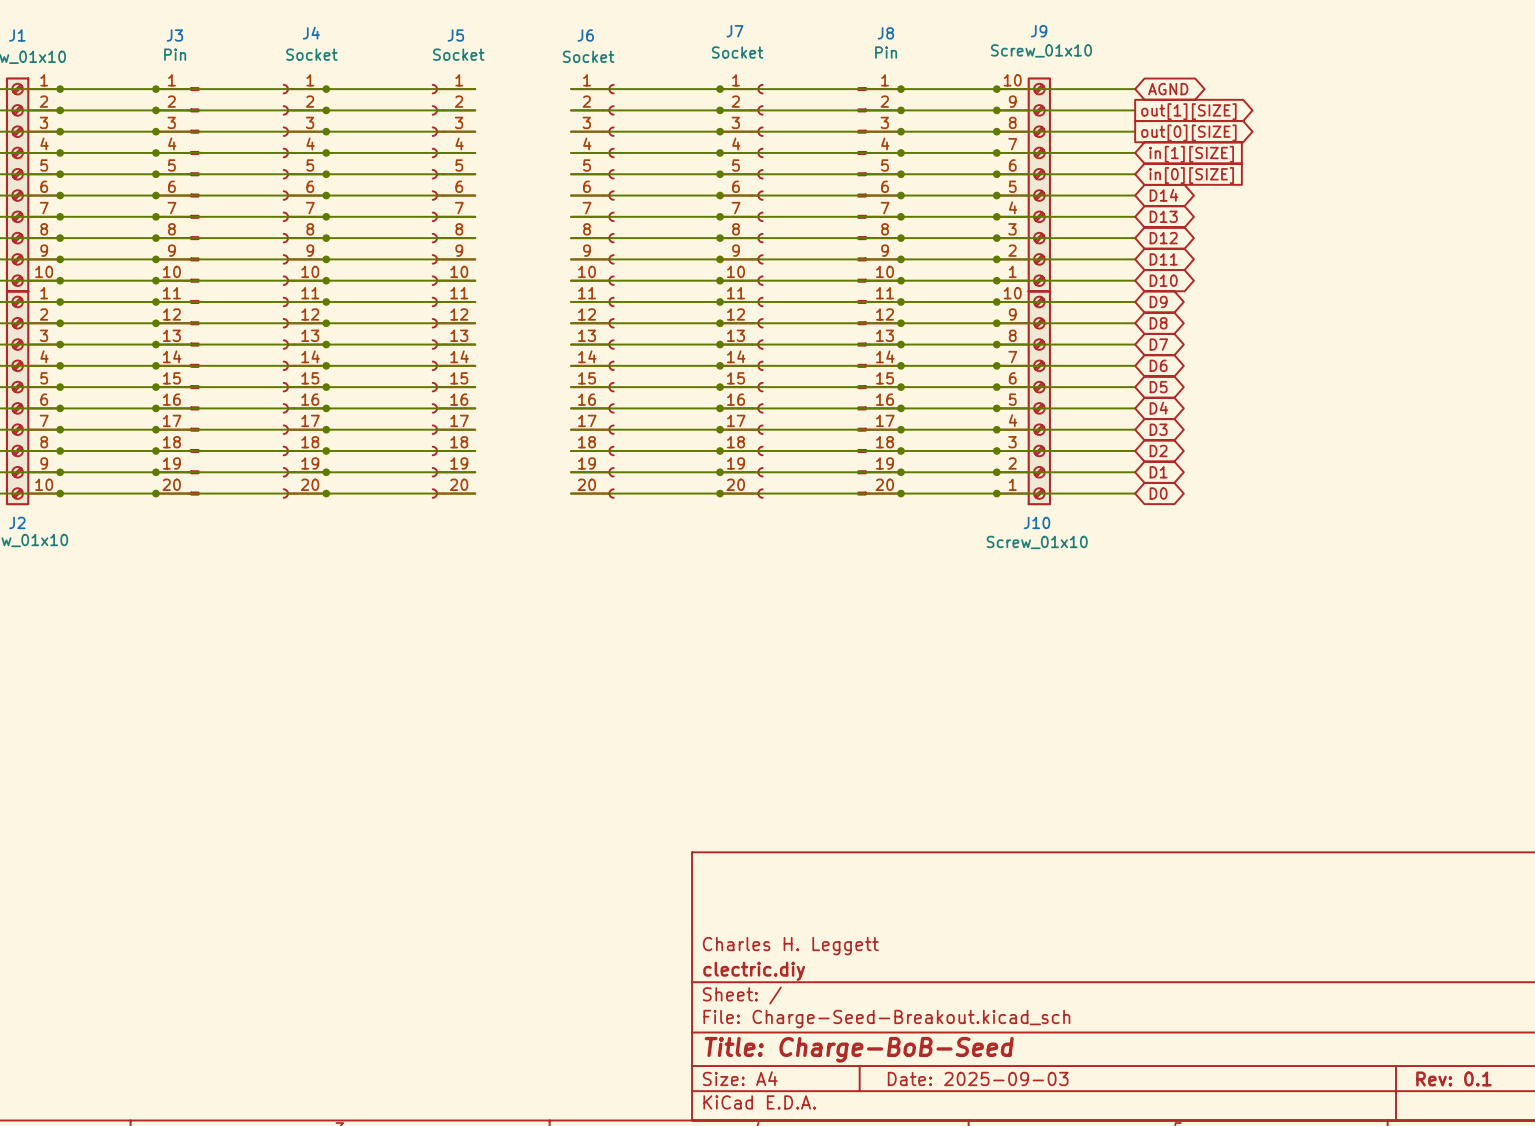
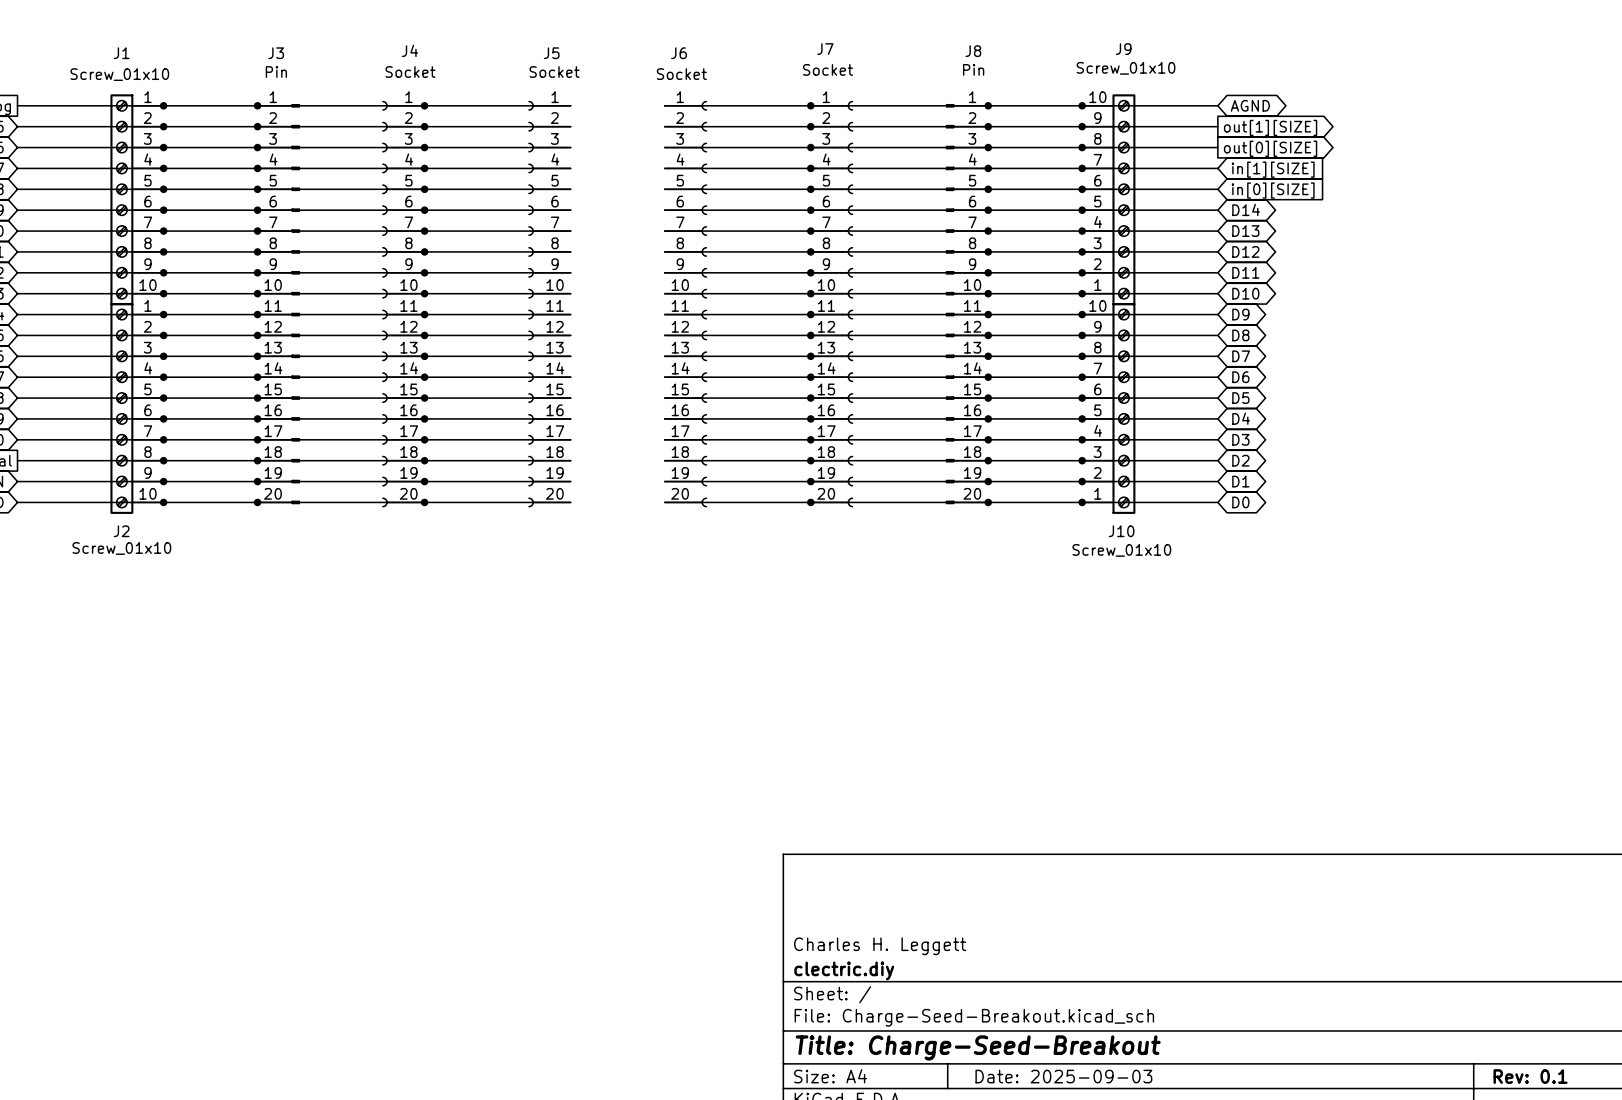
title block: Title: Charge-BoB-Seed (859, 1049) -> Title: Charge-Seed-Breakout (978, 1047)

